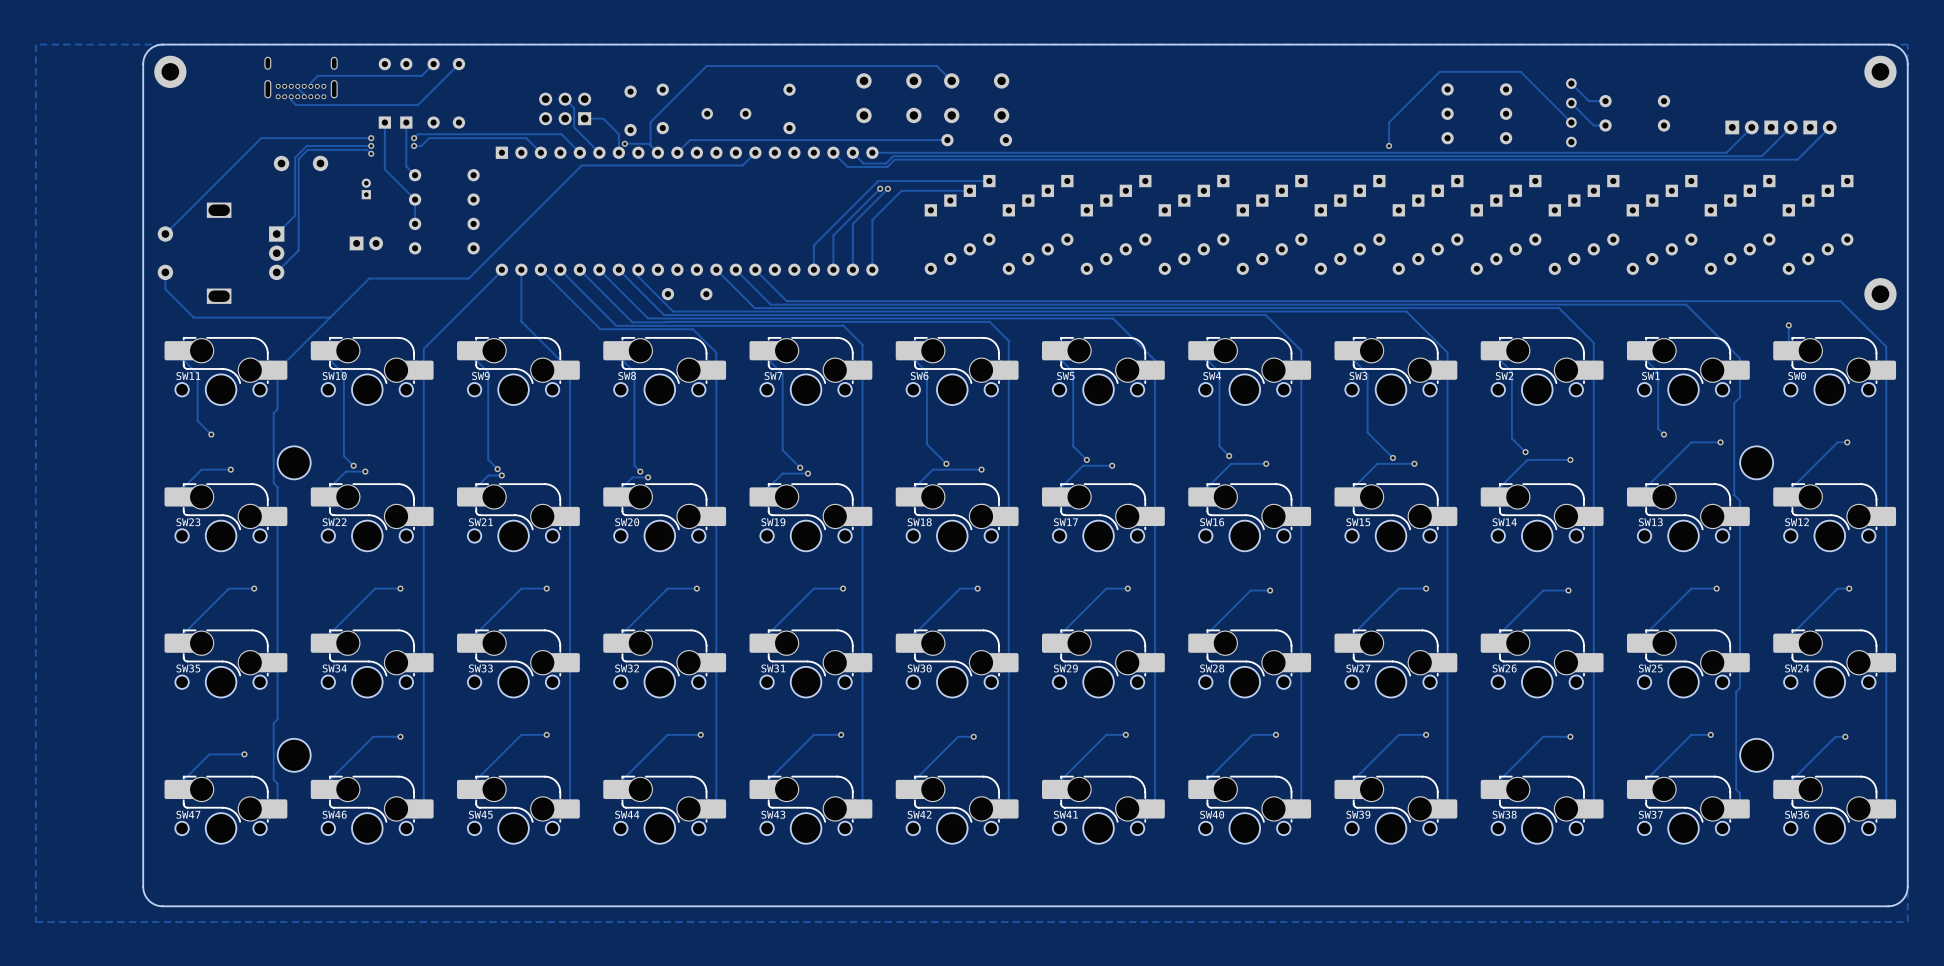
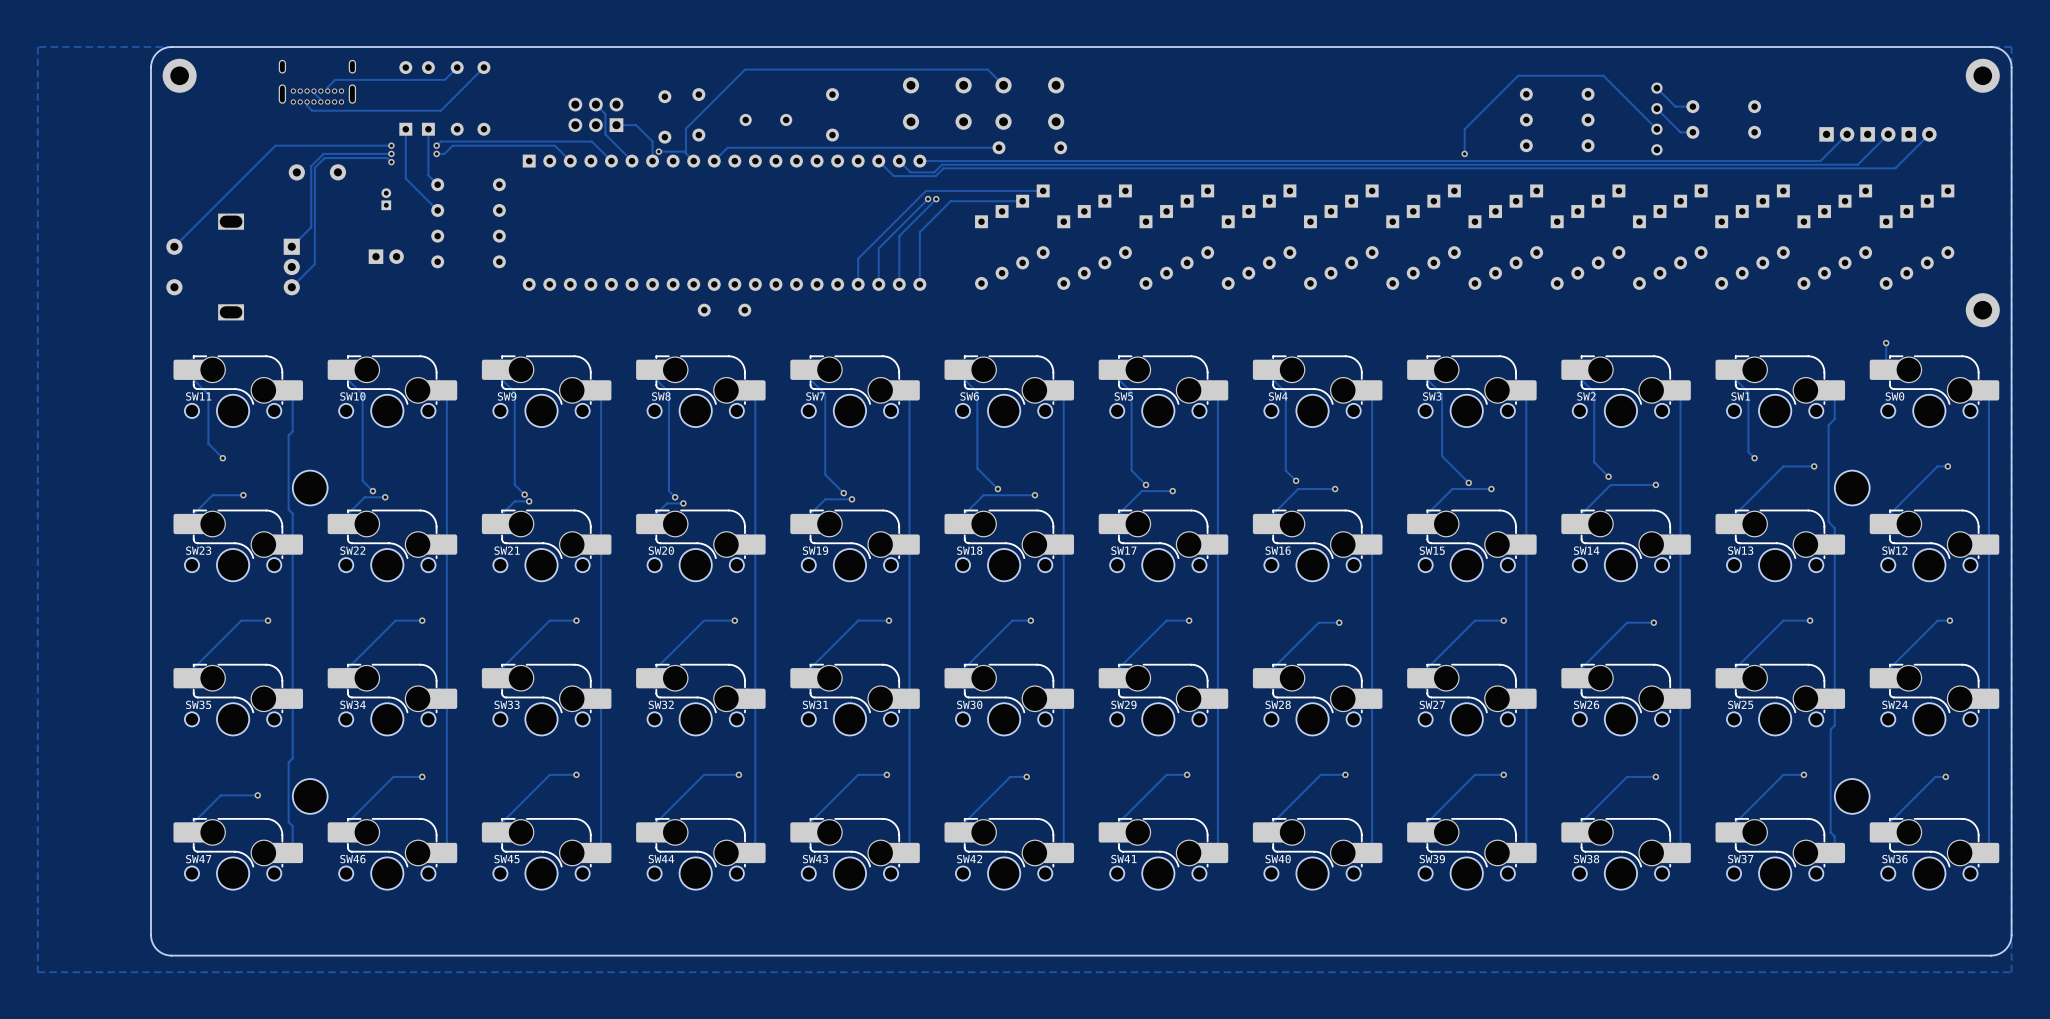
track: (755, 152) (742, 165) (581, 165) (468, 278) (369, 278) (277, 370) -> none
track: (415, 199) (415, 223) -> none
track: (501, 269) (423, 348) (423, 370) -> none
track: (521, 269) (521, 321) (570, 370) -> none
track: (540, 269) (600, 329) (692, 329) (716, 352) (716, 370) -> none
track: (560, 269) (616, 325) (843, 325) (862, 344) (862, 370) -> none
track: (579, 269) (632, 322) (989, 321) (1008, 340) (1008, 370) -> none
track: (599, 269) (648, 318) (1113, 318) (1155, 360) (1155, 370) -> none
track: (618, 269) (664, 315) (1265, 315) (1301, 350) (1301, 370) -> none
track: (638, 269) (638, 276) (673, 311) (1406, 311) (1447, 352) (1447, 370) -> none
track: (716, 269) (754, 308) (1558, 308) (1593, 342) (1593, 370) -> none
track: (735, 269) (770, 304) (1686, 304) (1740, 358) (1740, 370) -> none
track: (755, 269) (786, 301) (1840, 301) (1886, 346) (1886, 370) -> none
track: (165, 272) (165, 289) (193, 317) (330, 317) -> none

